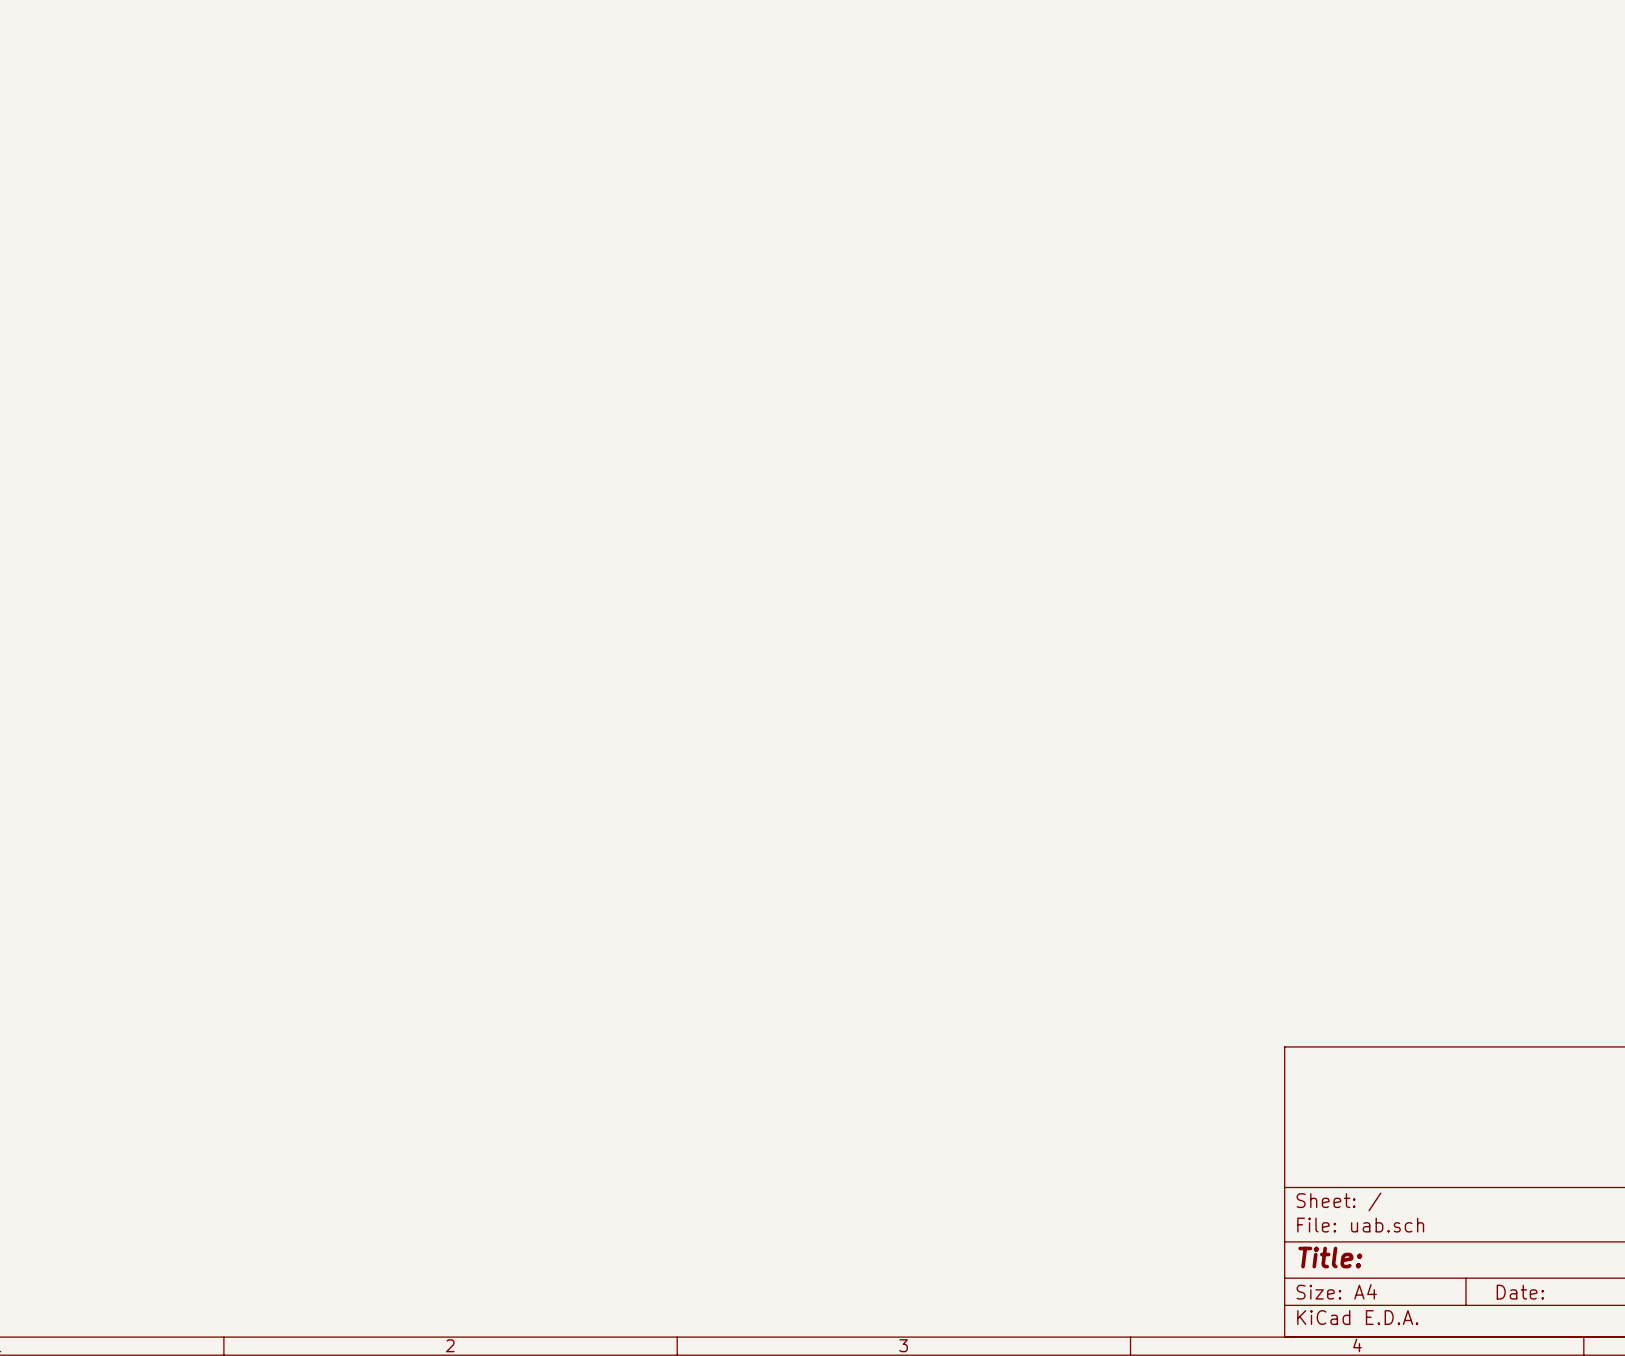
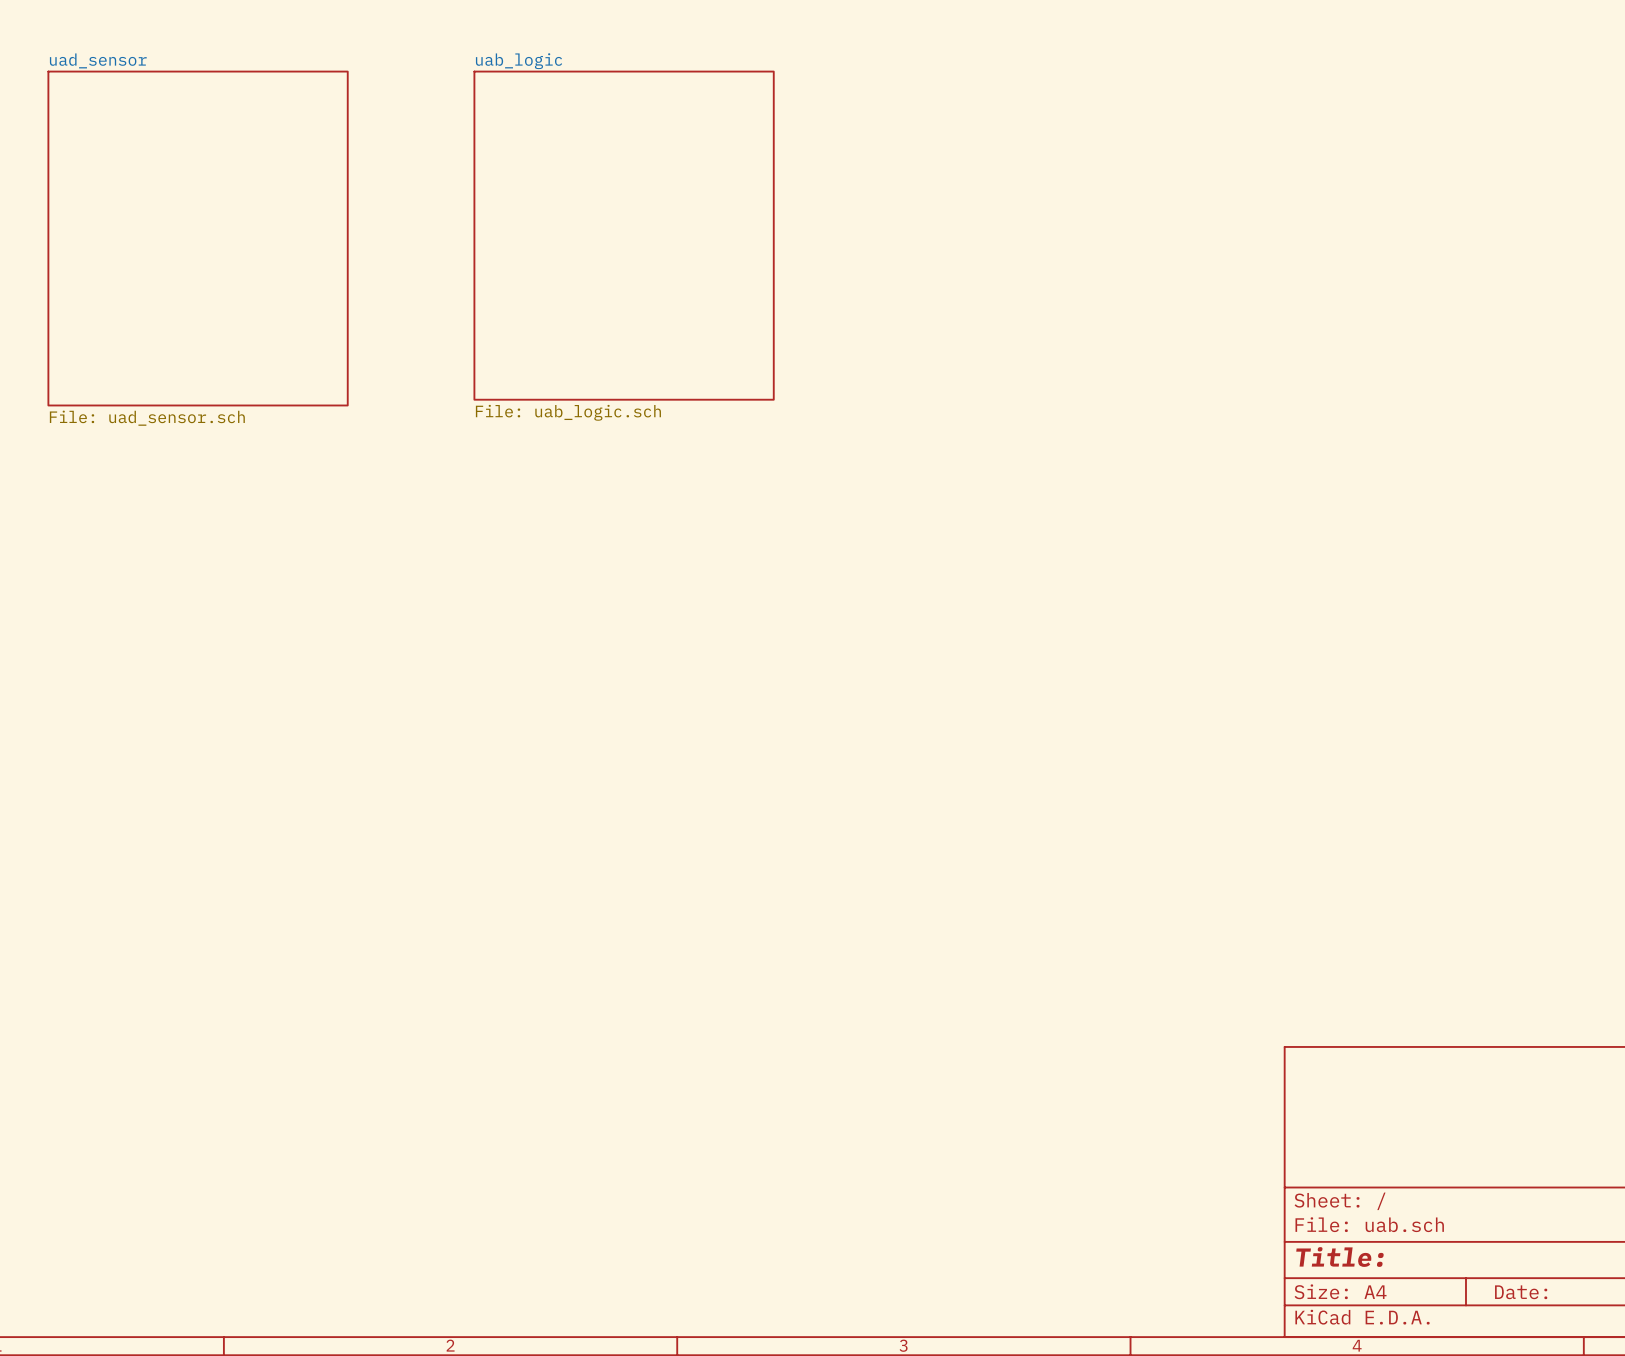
sheet uab_logic: none -> File: uab_logic.sch (624, 235)
sheet uad_sensor: none -> File: uad_sensor.sch (198, 238)

